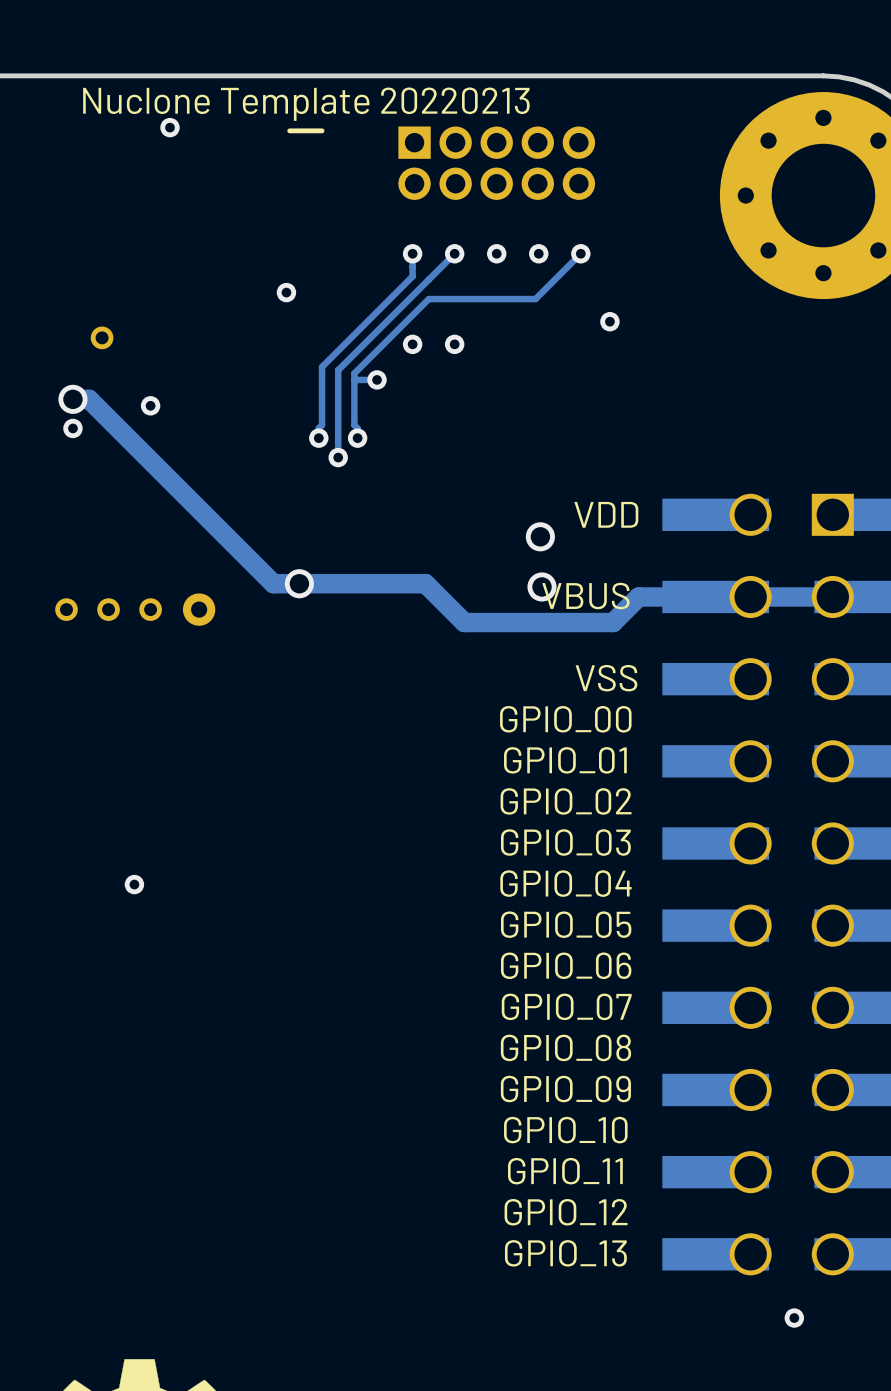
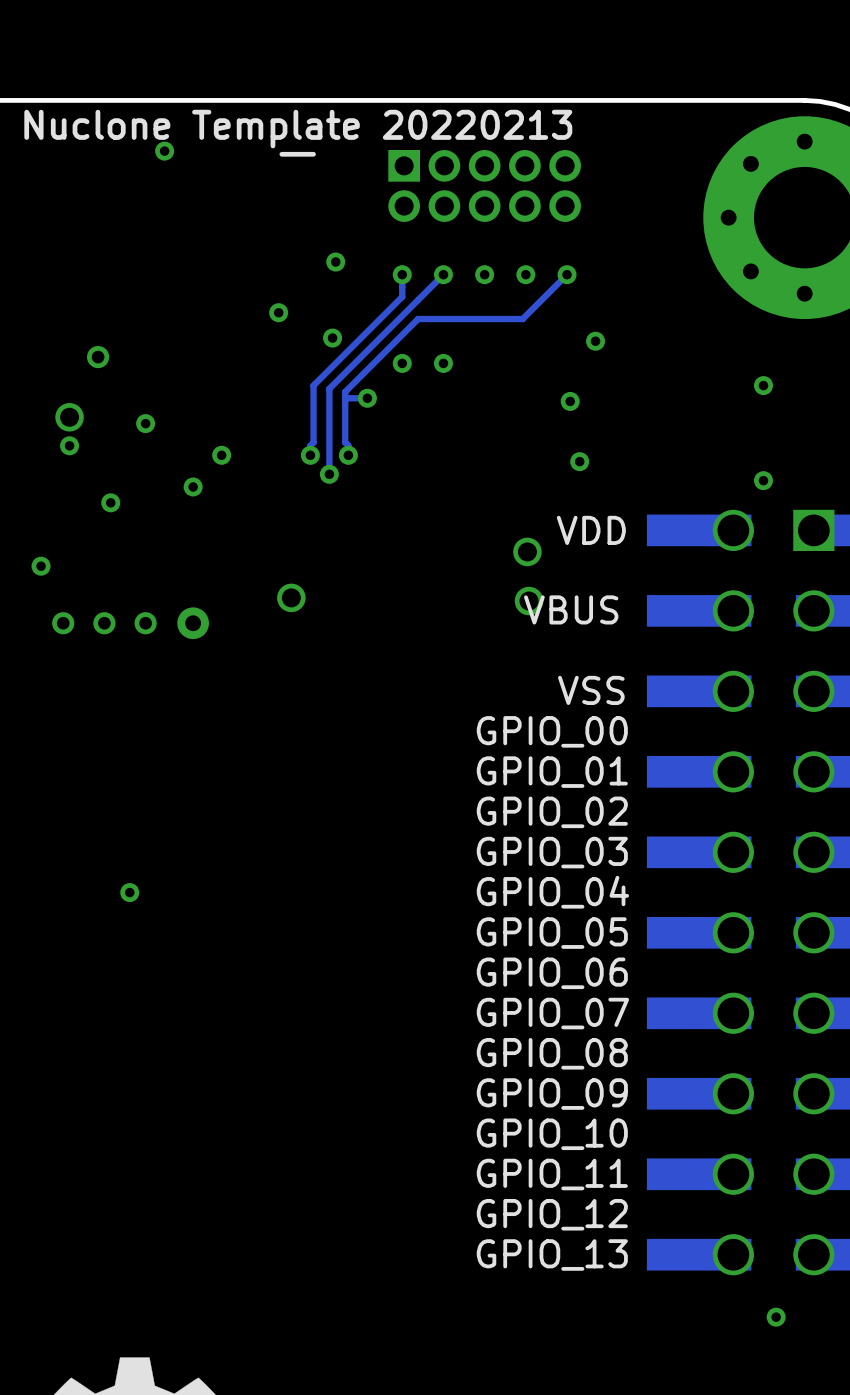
via: none -> (335, 262)
via: none -> (332, 338)
via: none -> (763, 385)
via: none -> (570, 401)
track: (72, 399) (89, 399) (273, 583) (425, 583) (464, 622) (613, 622) (638, 596) (832, 596) -> none
via: none -> (221, 455)
via: none -> (579, 461)
via: none -> (763, 480)
via: none -> (193, 486)
via: none -> (110, 502)
via: none -> (41, 566)

